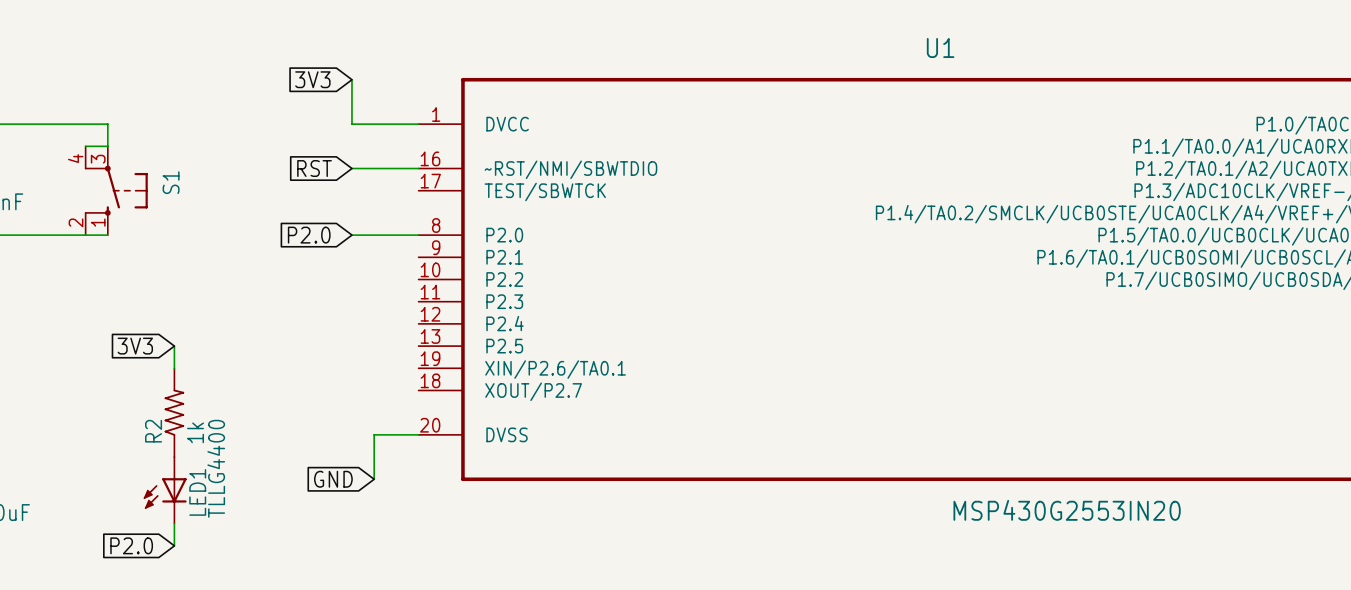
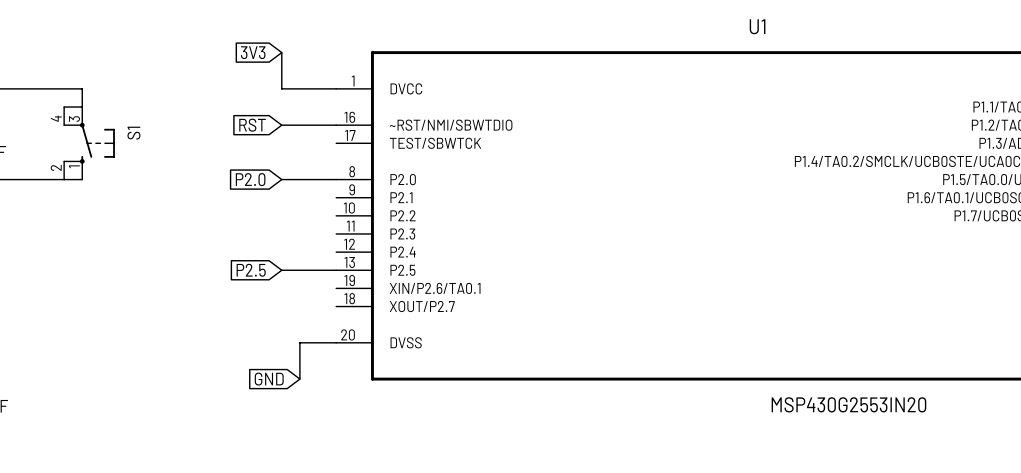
global label: 3V3 (135, 346) -> none
wire: (174, 346) (174, 368) -> none
global label: none -> P2.5 (251, 270)
wire: none -> (281, 270) (336, 270)
R2: 1k (174, 412) -> none
LED1: TLLG4400 (165, 490) -> none
wire: (174, 523) (174, 545) -> none
global label: P2.0 (131, 545) -> none

